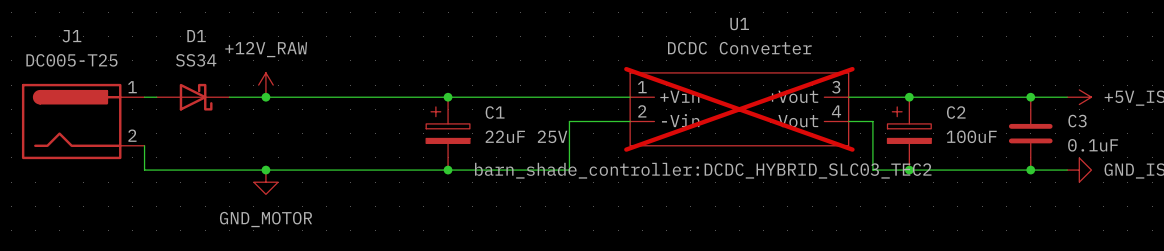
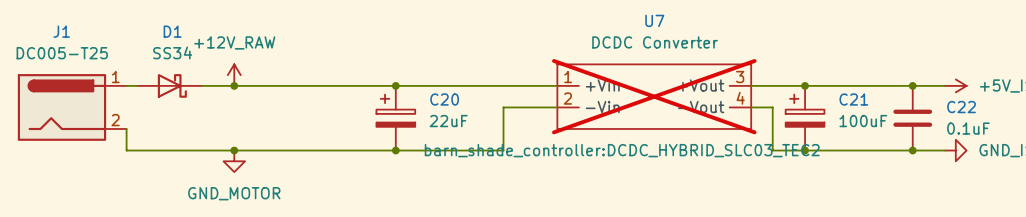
U1 name: U1 (739, 24) -> U7 (654, 20)
C1 name: C1 (495, 112) -> C20 (444, 99)
C2 name: C2 (956, 112) -> C21 (853, 99)
C3 name: C3 (1077, 121) -> C22 (961, 107)
C1 value: 22uF 25V (526, 136) -> 22uF (448, 121)

